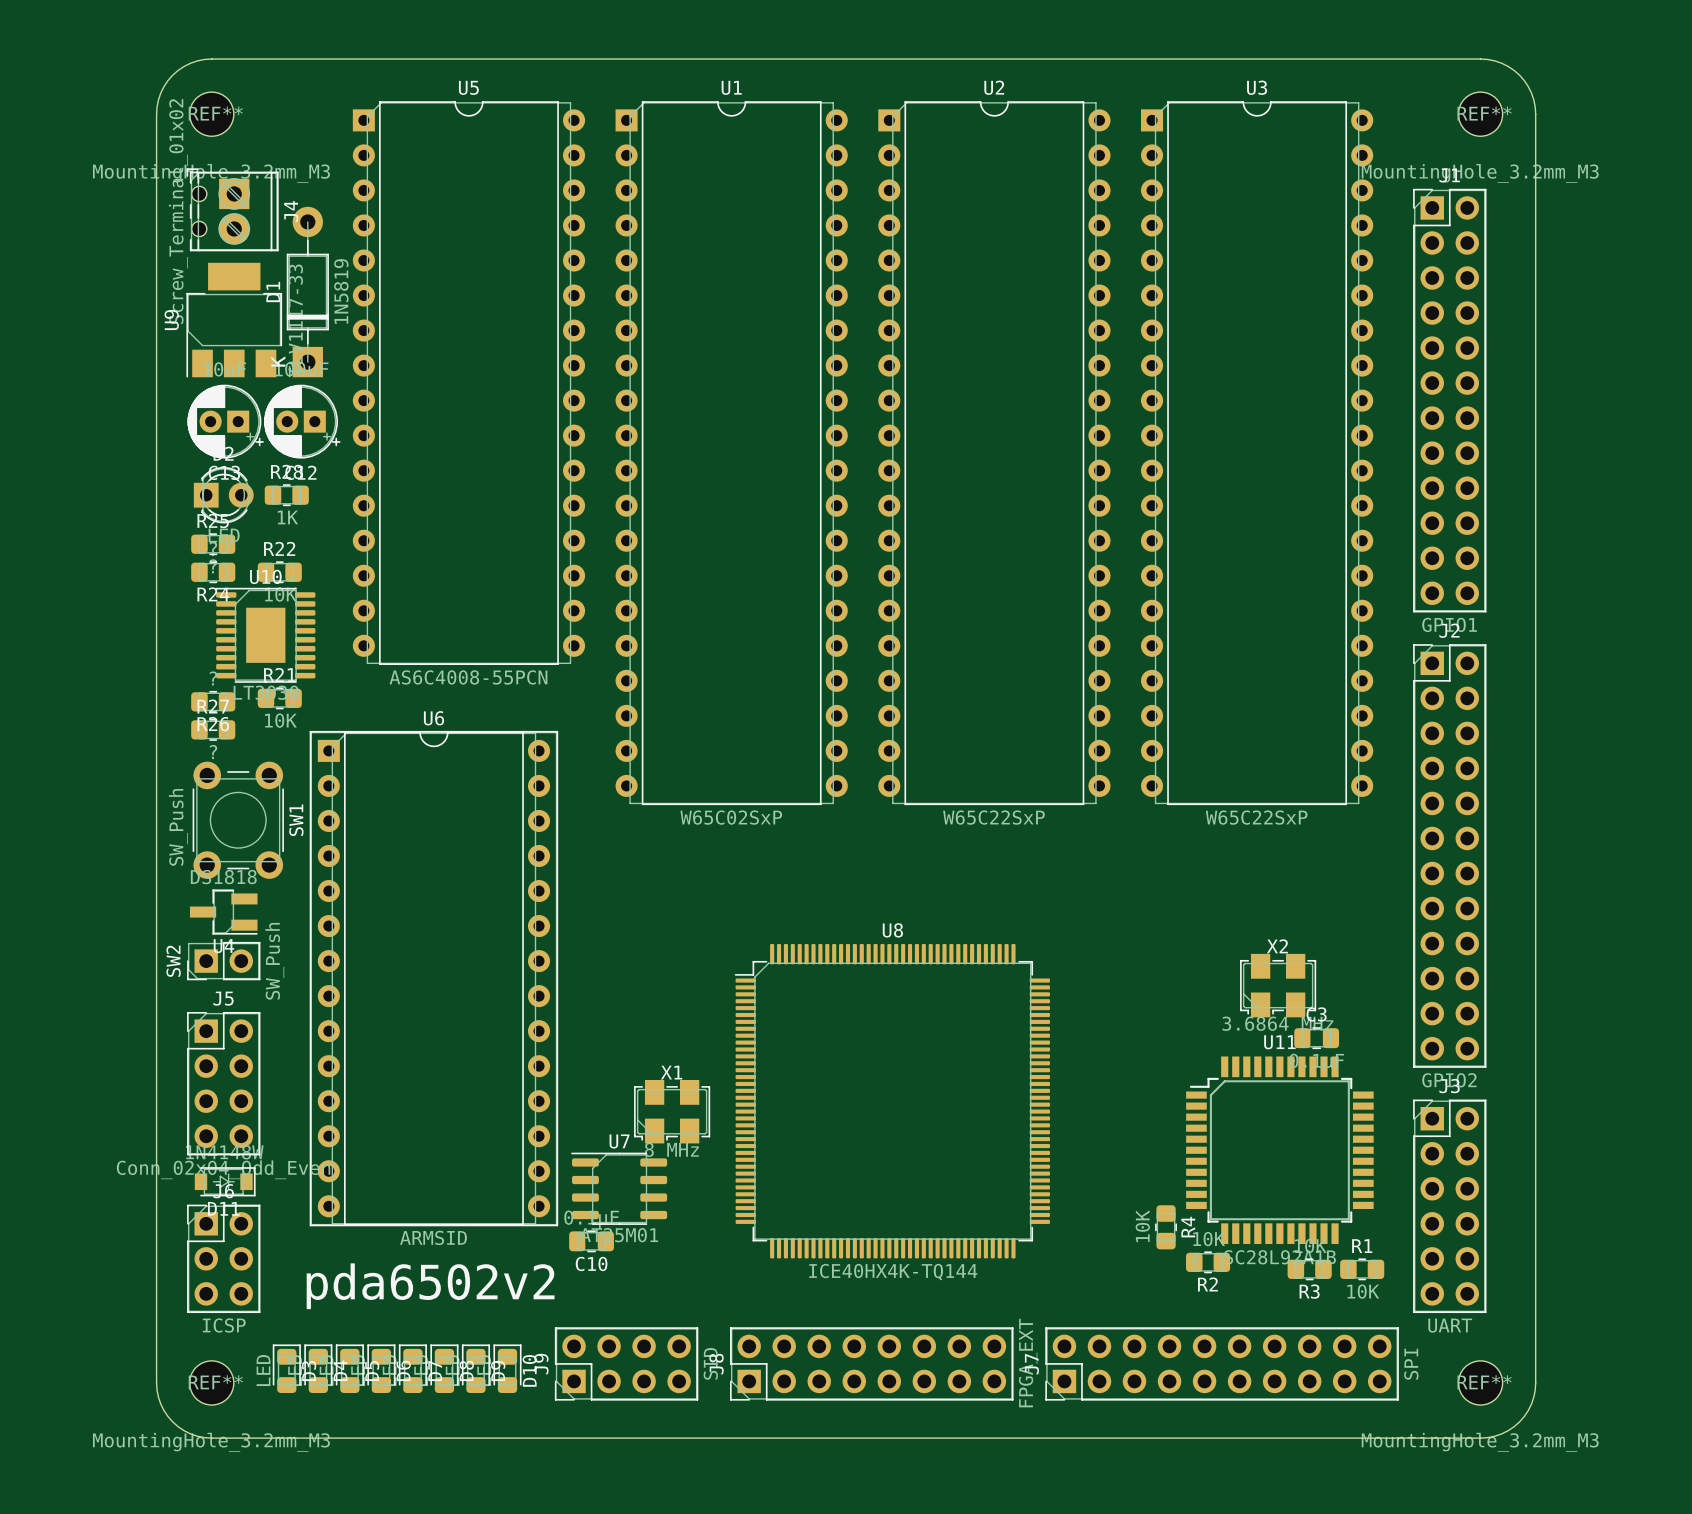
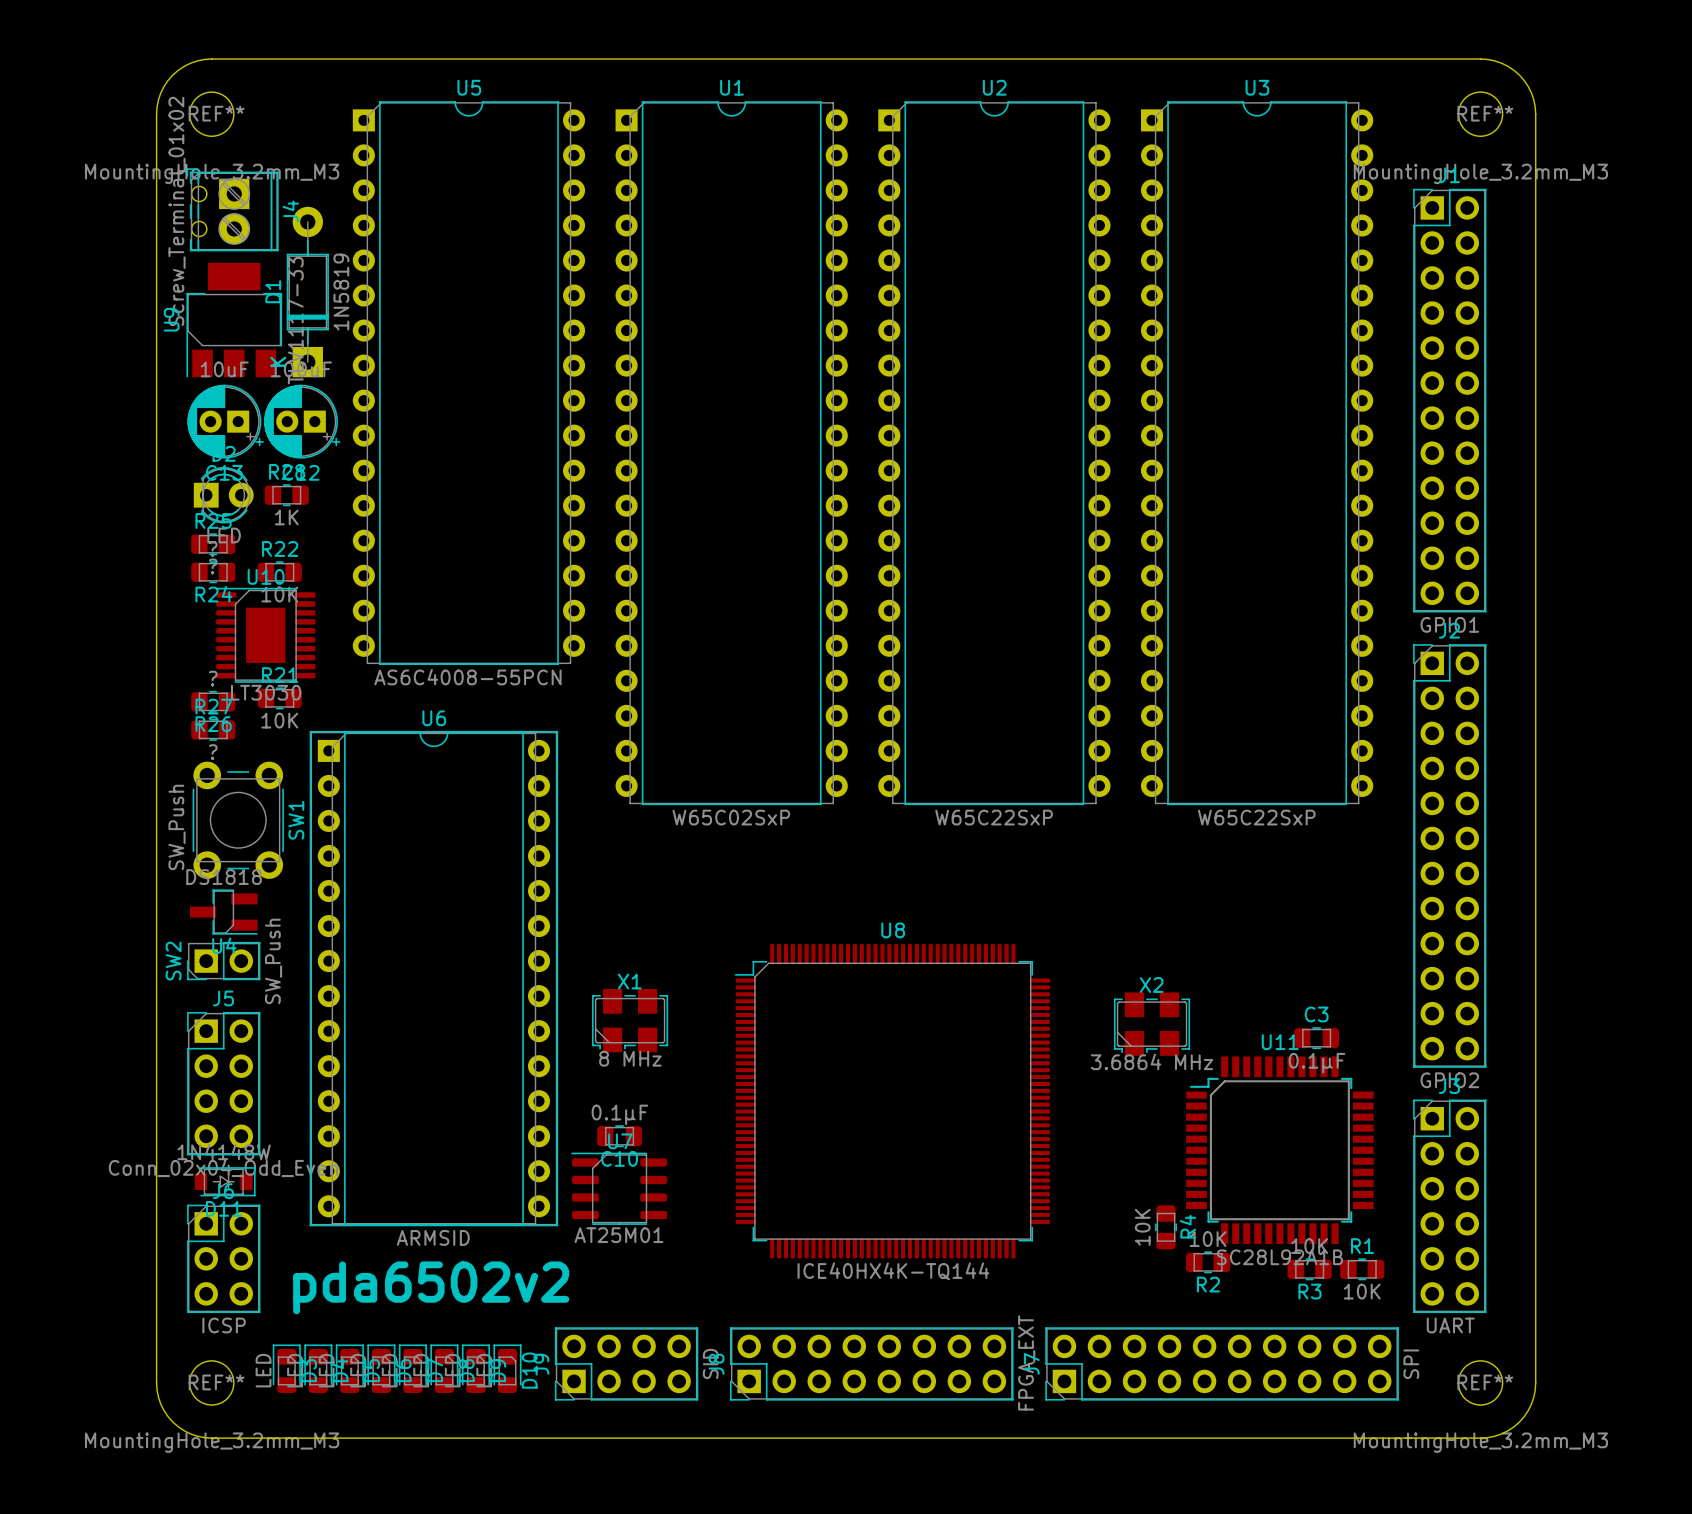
X2 position: (1278, 985) -> (1152, 1024)
X1 position: (672, 1111) -> (630, 1020)
C10 position: (591, 1241) -> (619, 1136)

